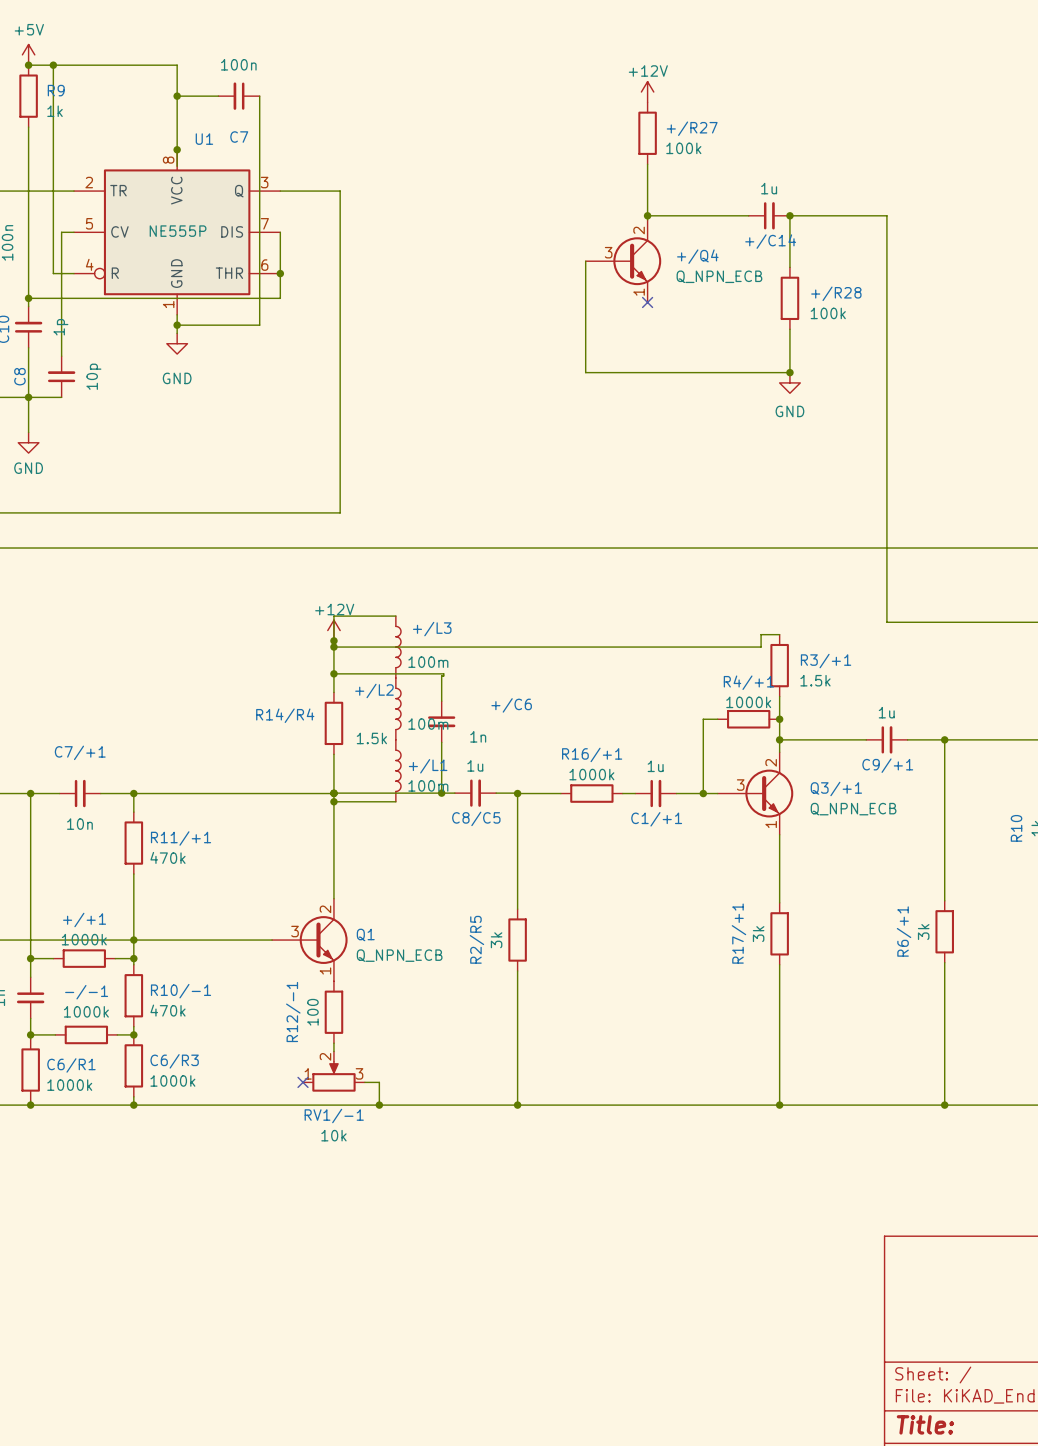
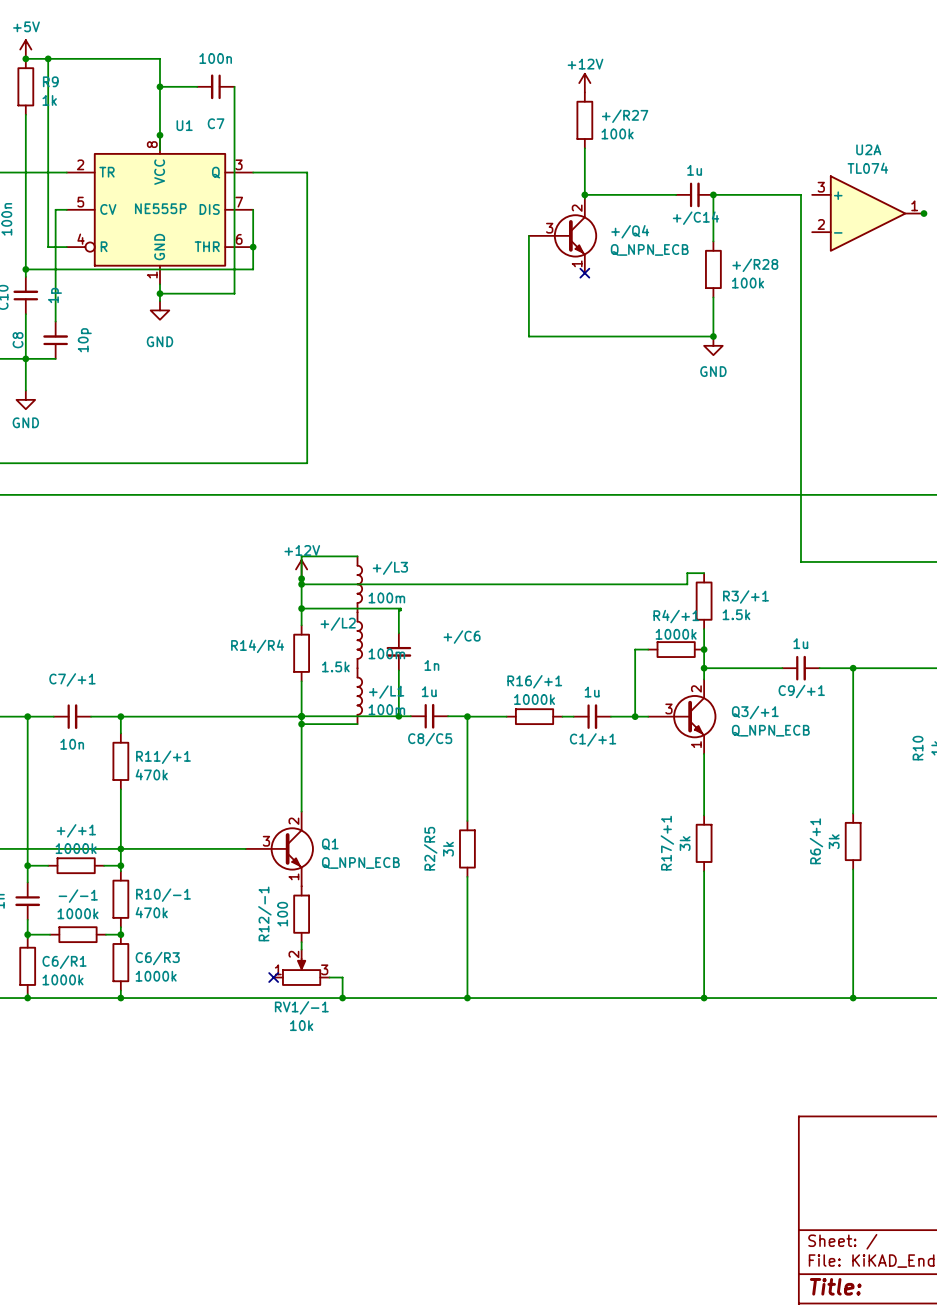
U2A: none -> TL074 (868, 213)
junction: none -> (923, 213)

